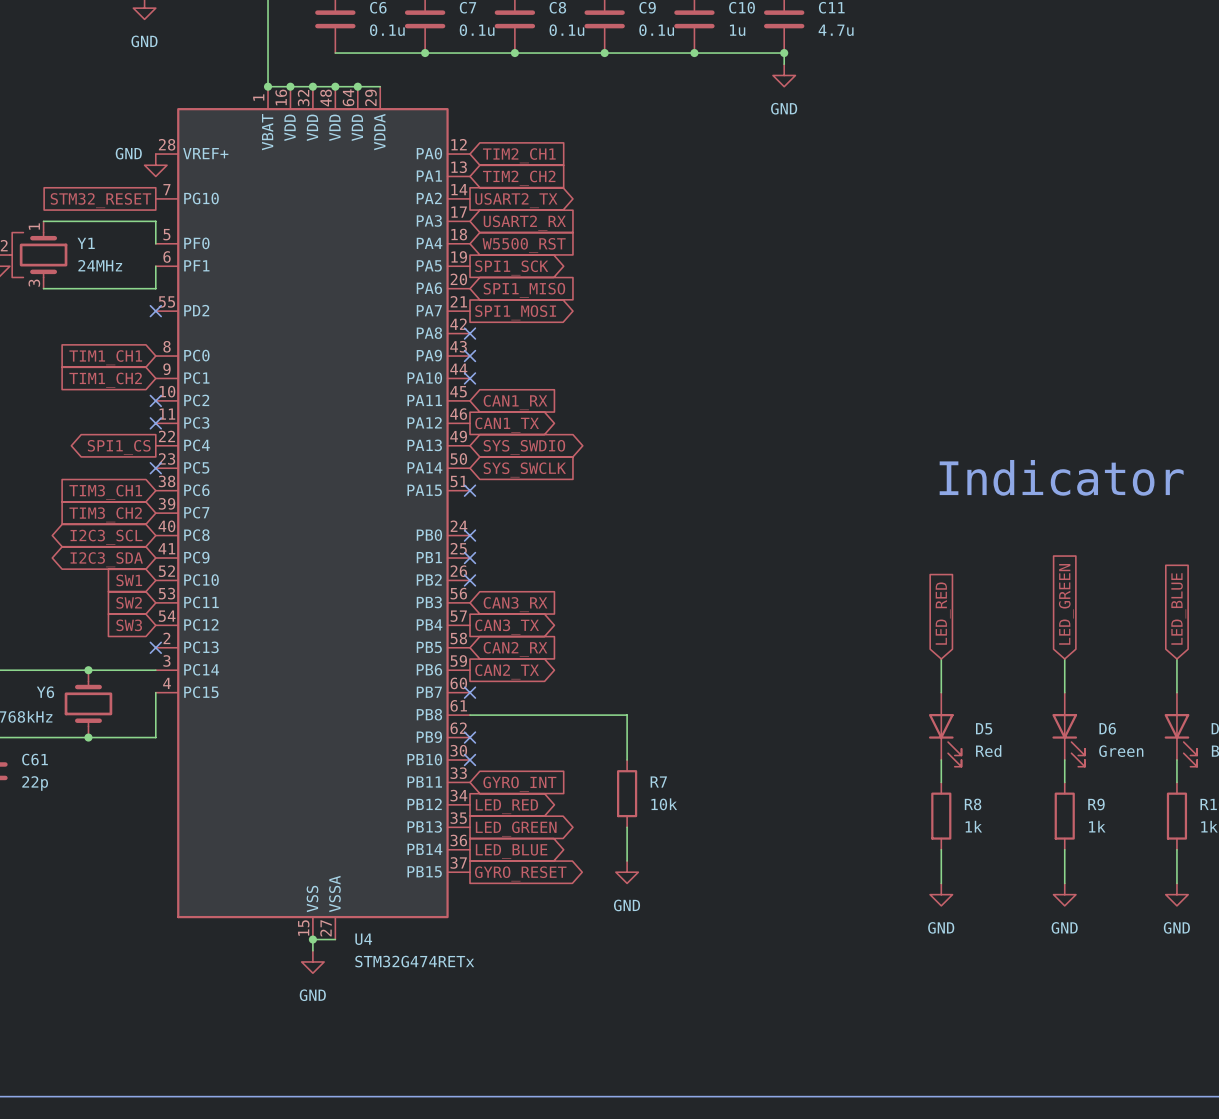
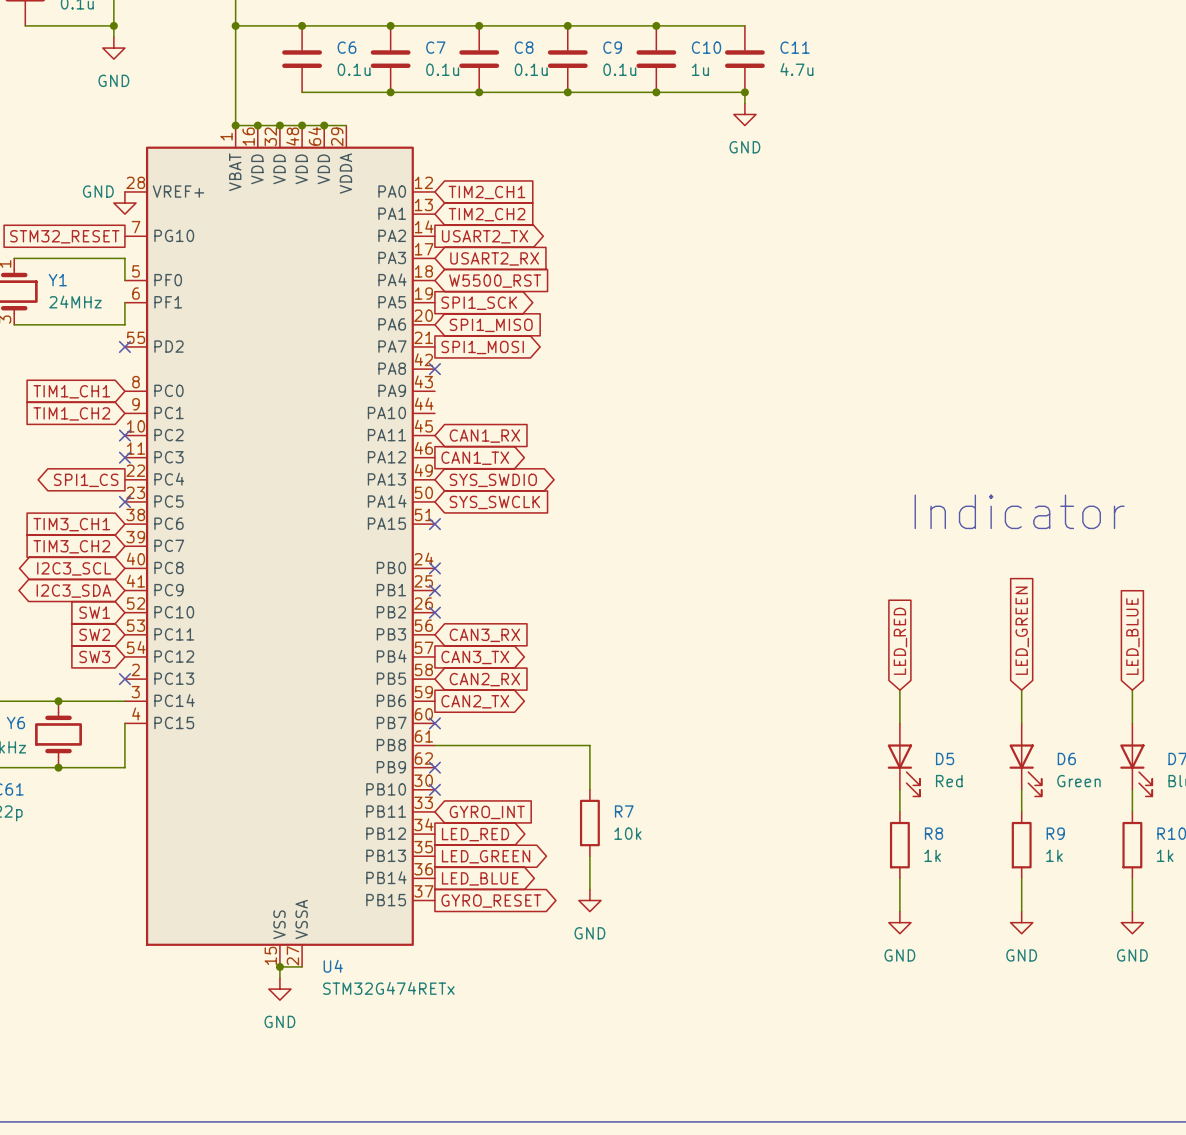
no-connect mark: (470, 356) -> none
no-connect mark: (470, 378) -> none

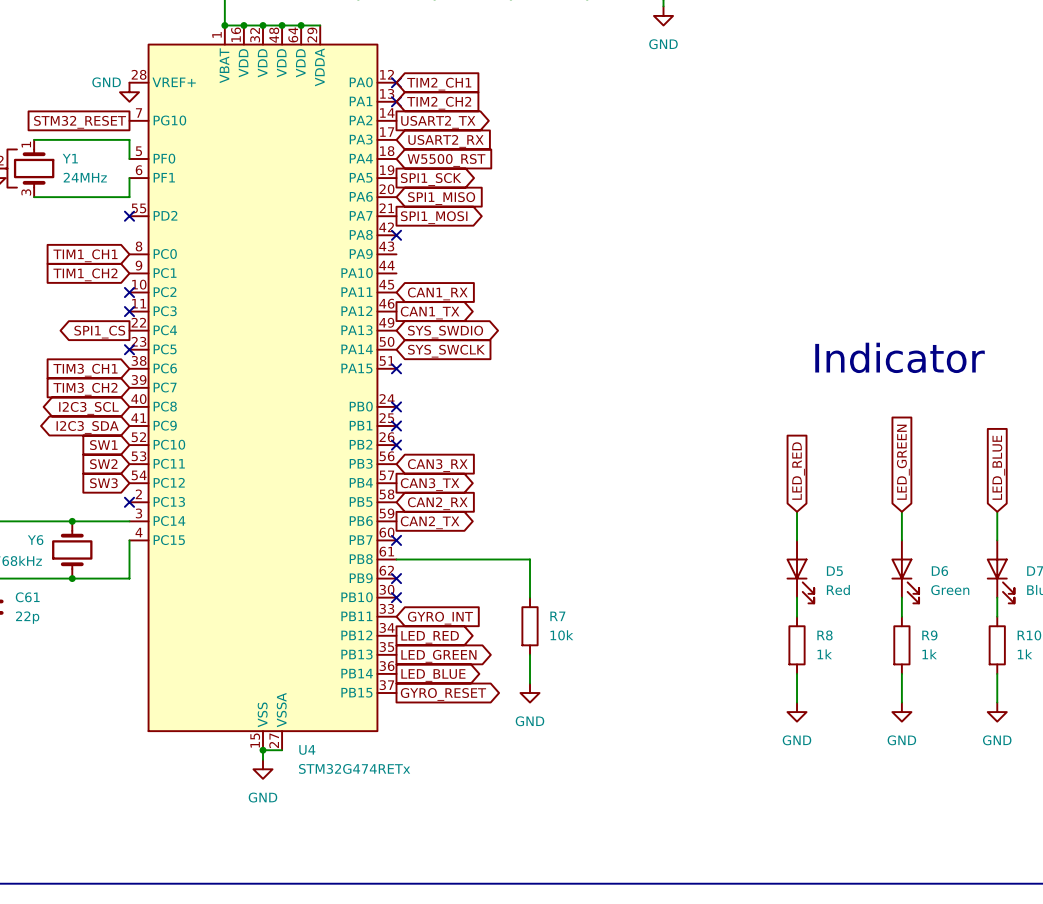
no-connect mark: none -> (396, 82)
no-connect mark: none -> (396, 101)

